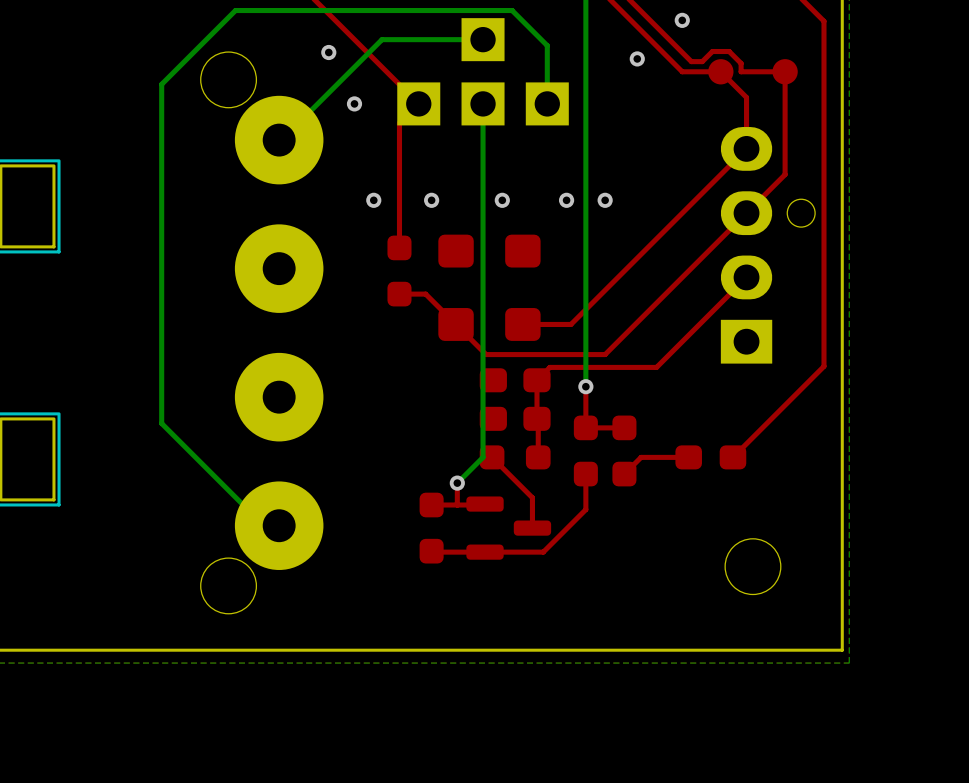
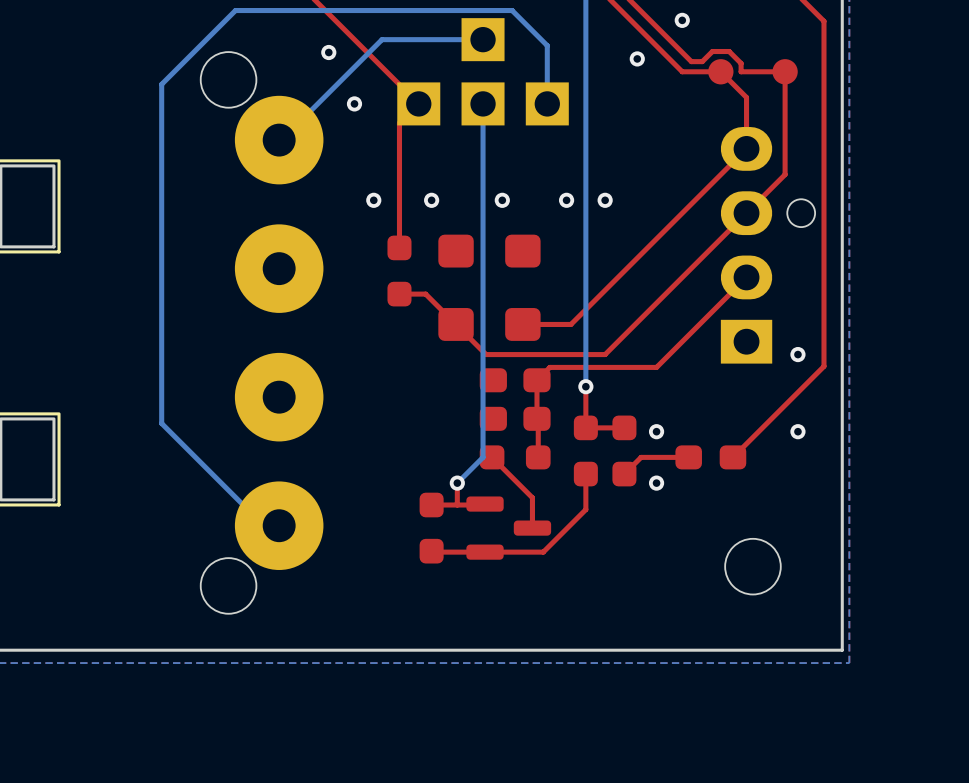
via: none -> (797, 354)
via: none -> (656, 431)
via: none -> (797, 431)
via: none -> (656, 483)

